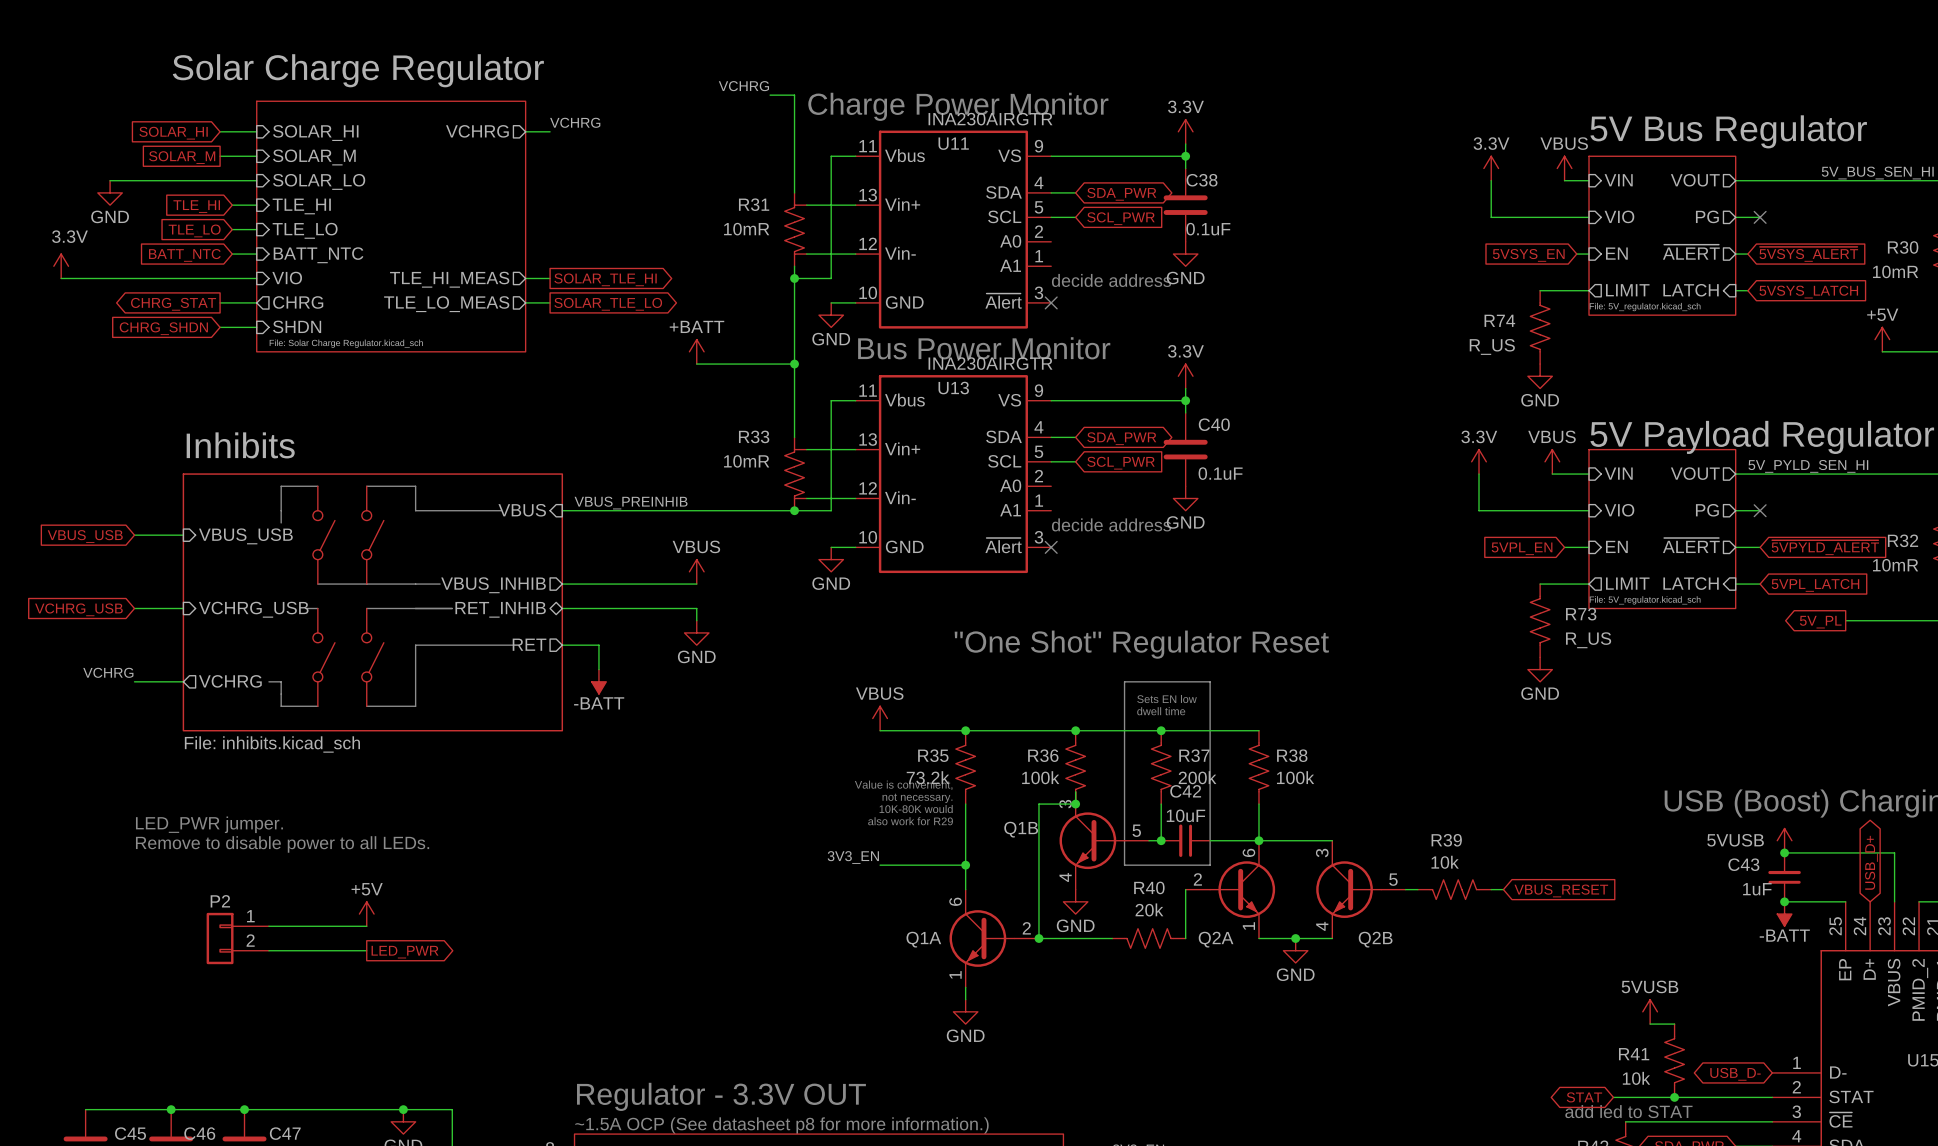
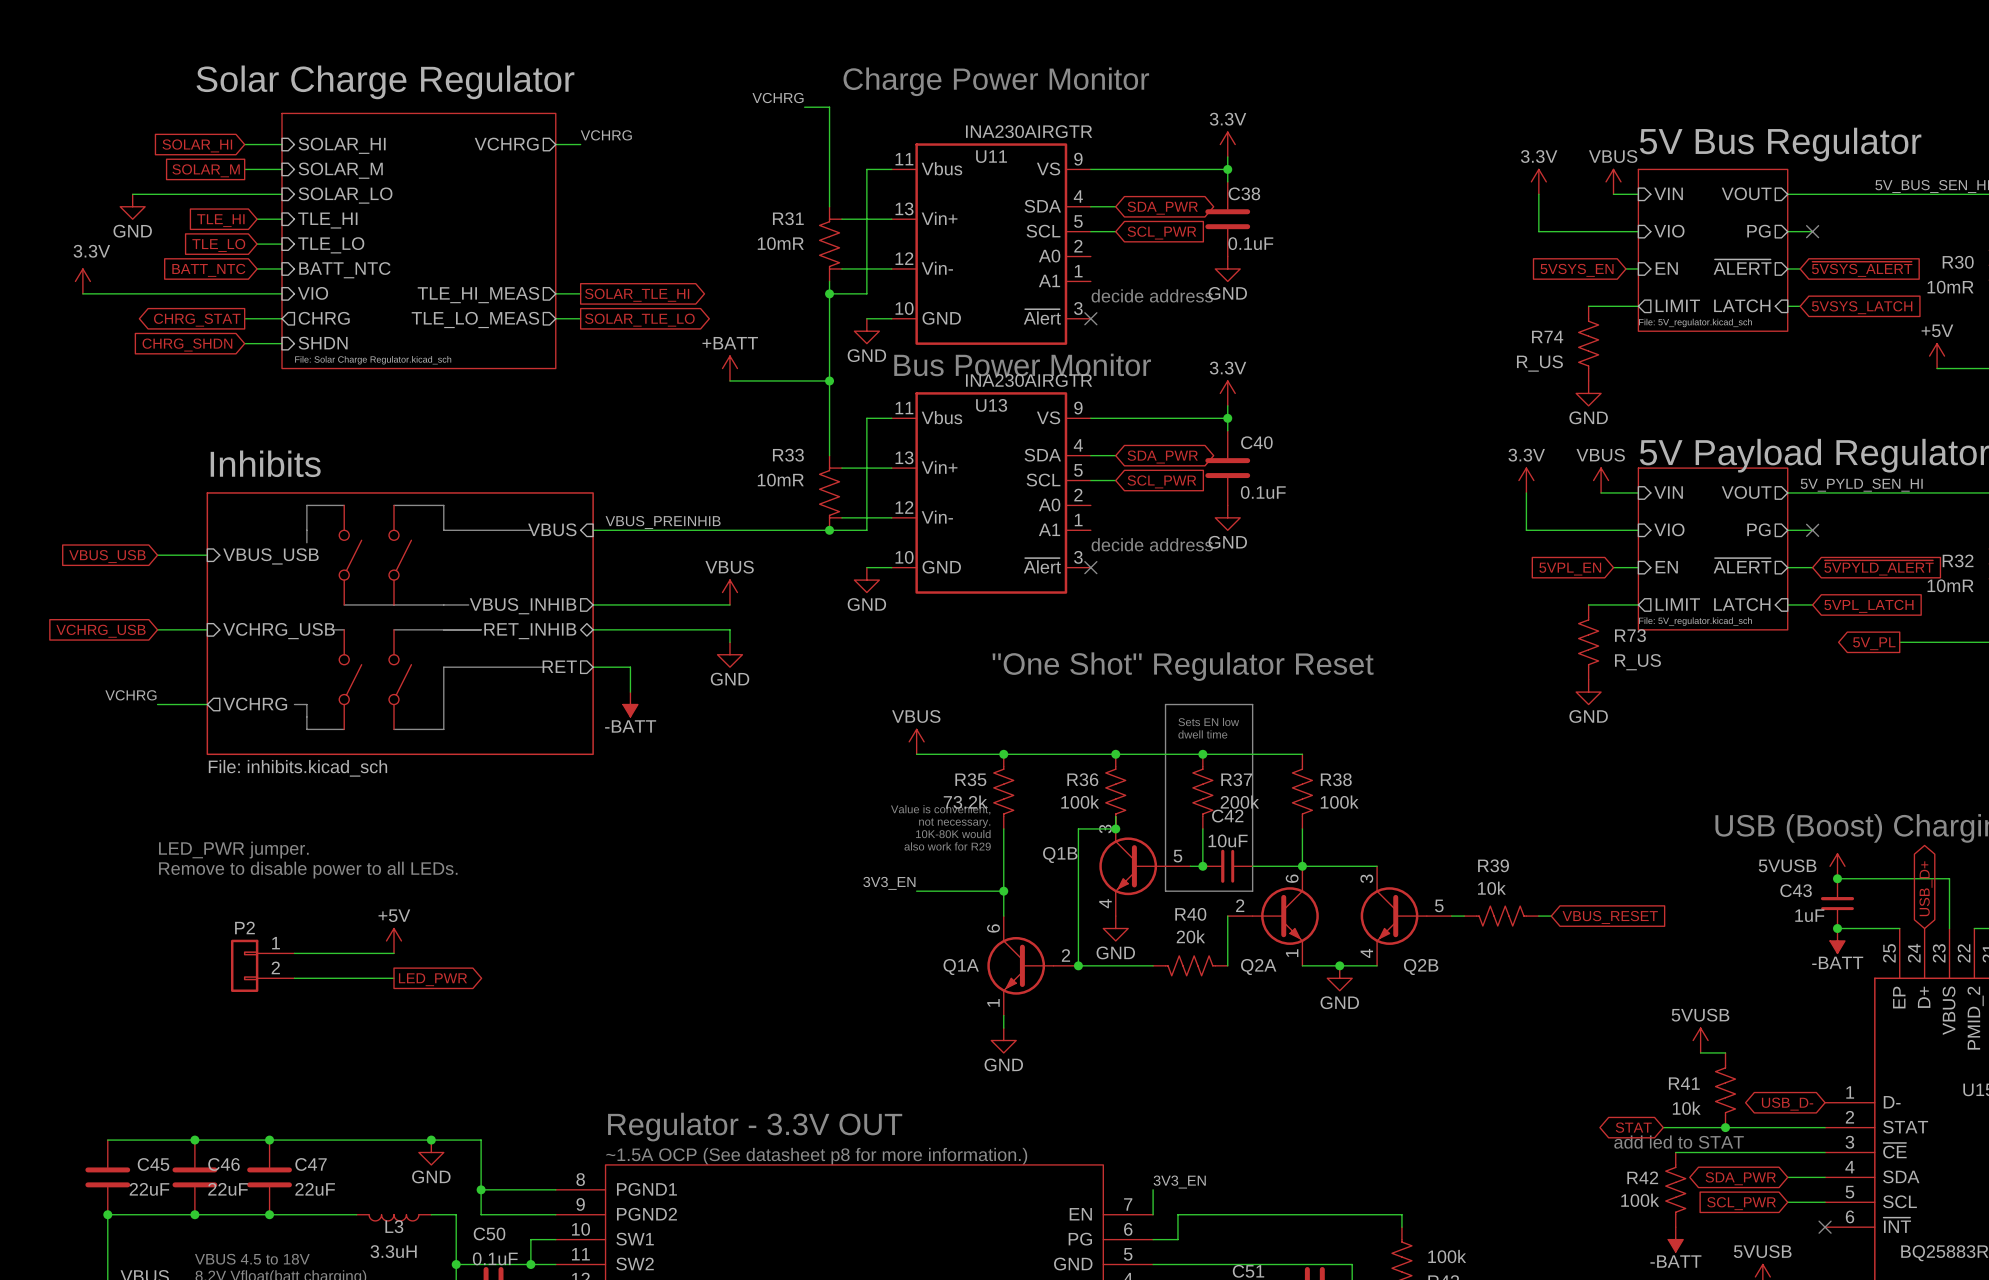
text position: Charge Power Monitor (958, 106) -> Charge Power Monitor (996, 81)

